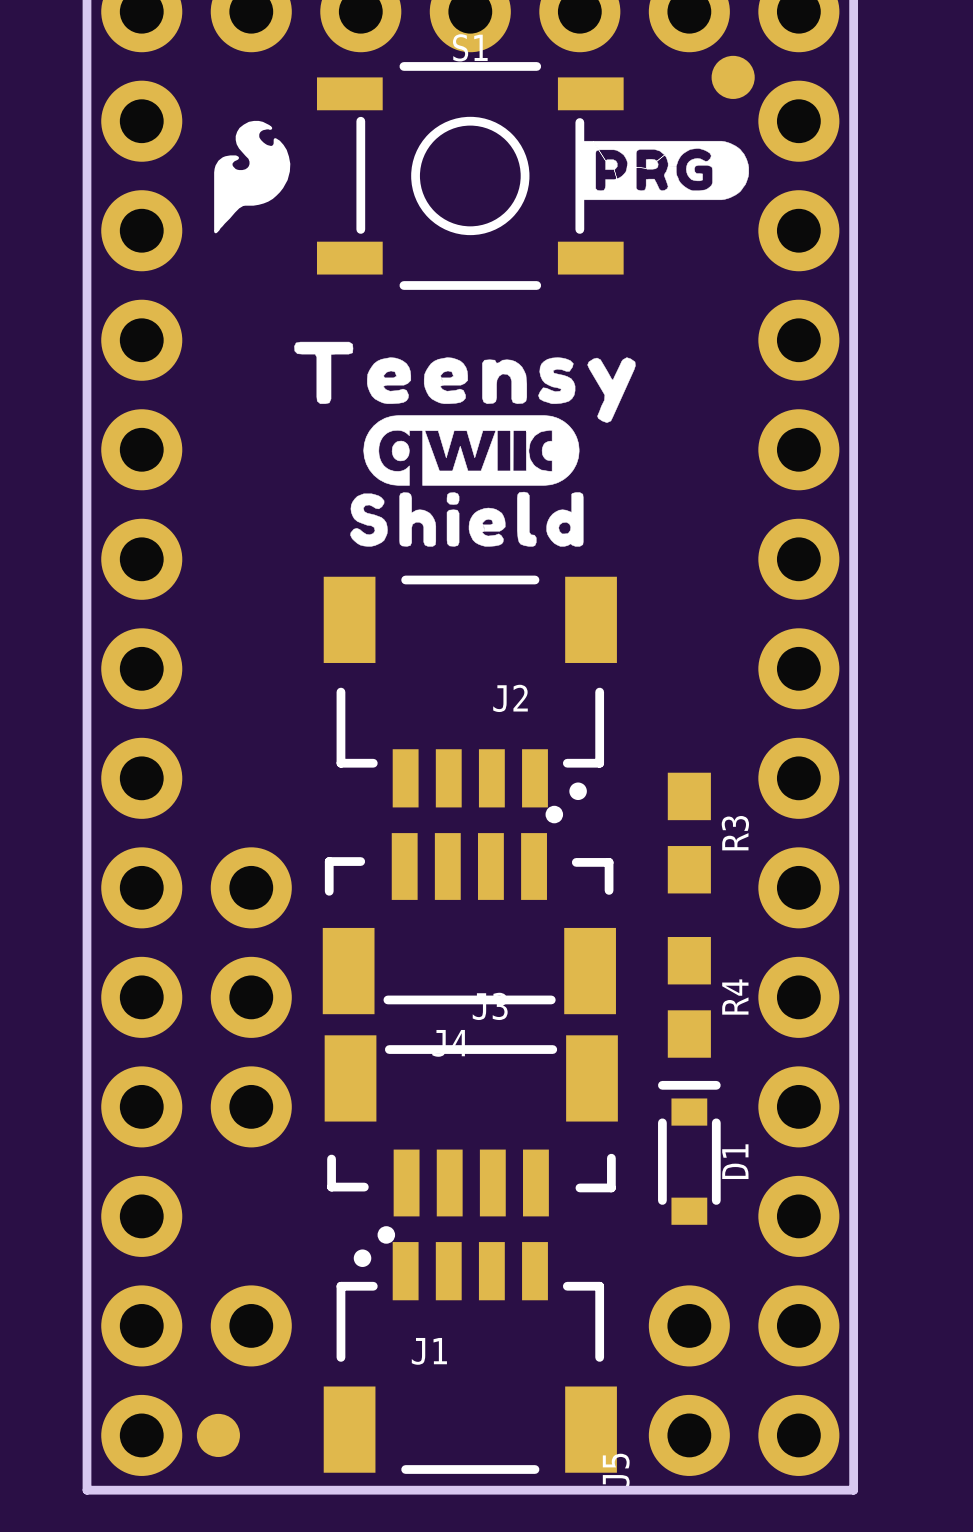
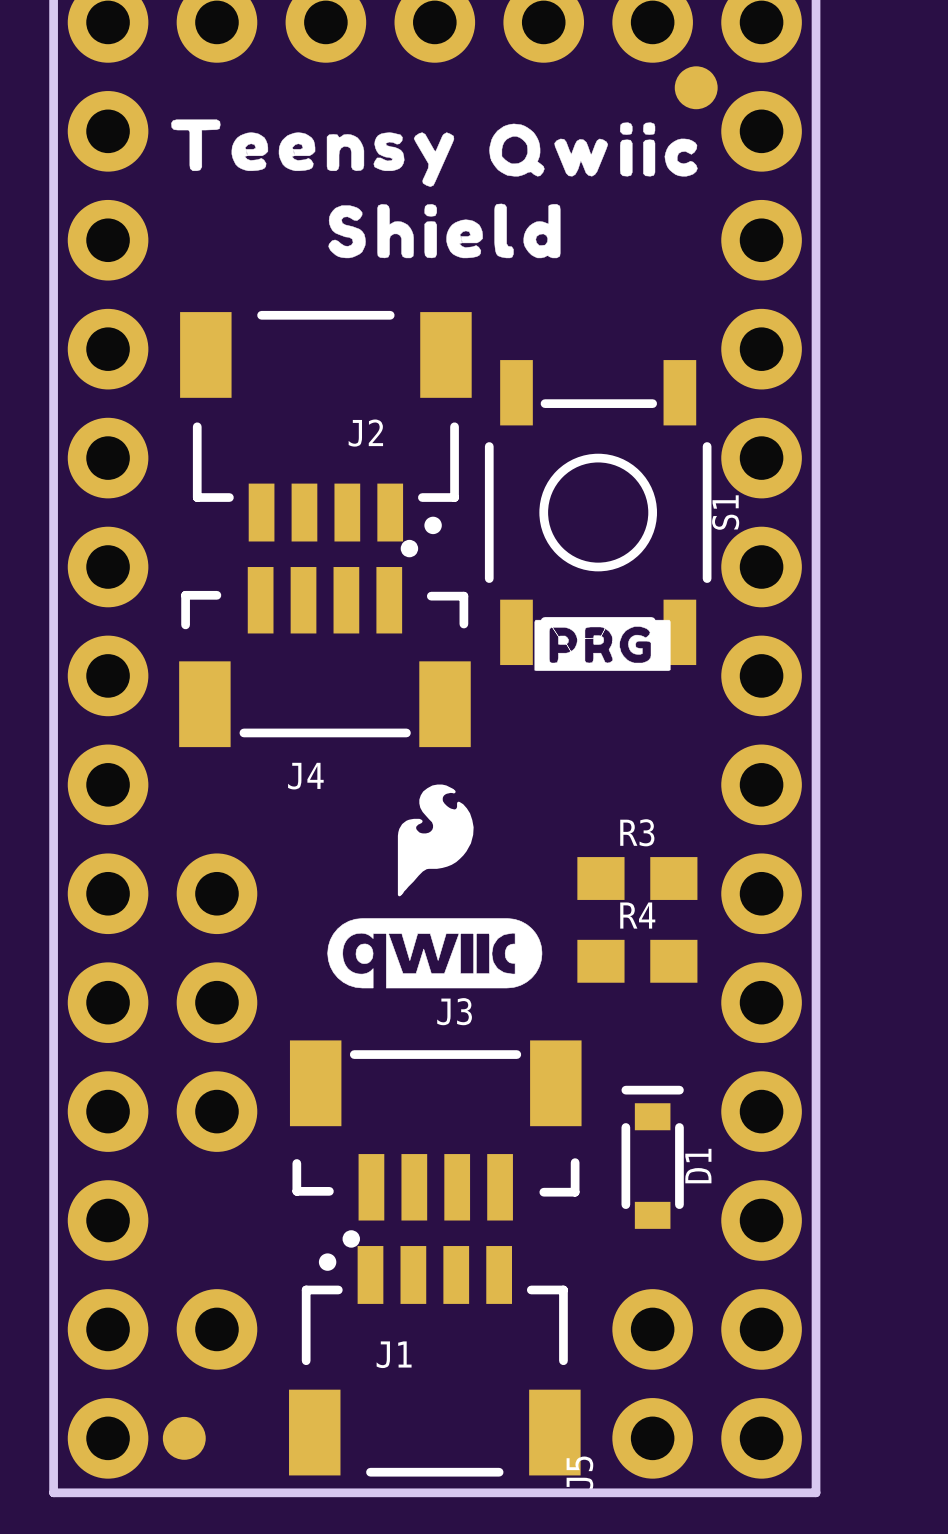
drawing: none -> [171, 119, 698, 187]
drawing: [578, 140, 749, 201] -> none
S1 rotation: 0° (470, 175) -> 90° clockwise (598, 512)
S1 position: (470, 175) -> (598, 512)
drawing position: (252, 177) -> (435, 840)
drawing: [294, 341, 636, 423] -> none
drawing position: (471, 450) -> (434, 953)
drawing position: (466, 519) -> (444, 230)
drawing: none -> [534, 619, 671, 671]
J2 position: (470, 691) -> (325, 426)
R3 rotation: 0° (689, 833) -> 90° clockwise (637, 878)
J4 position: (469, 909) -> (324, 643)
R4 rotation: 0° (689, 997) -> 90° clockwise (637, 961)

